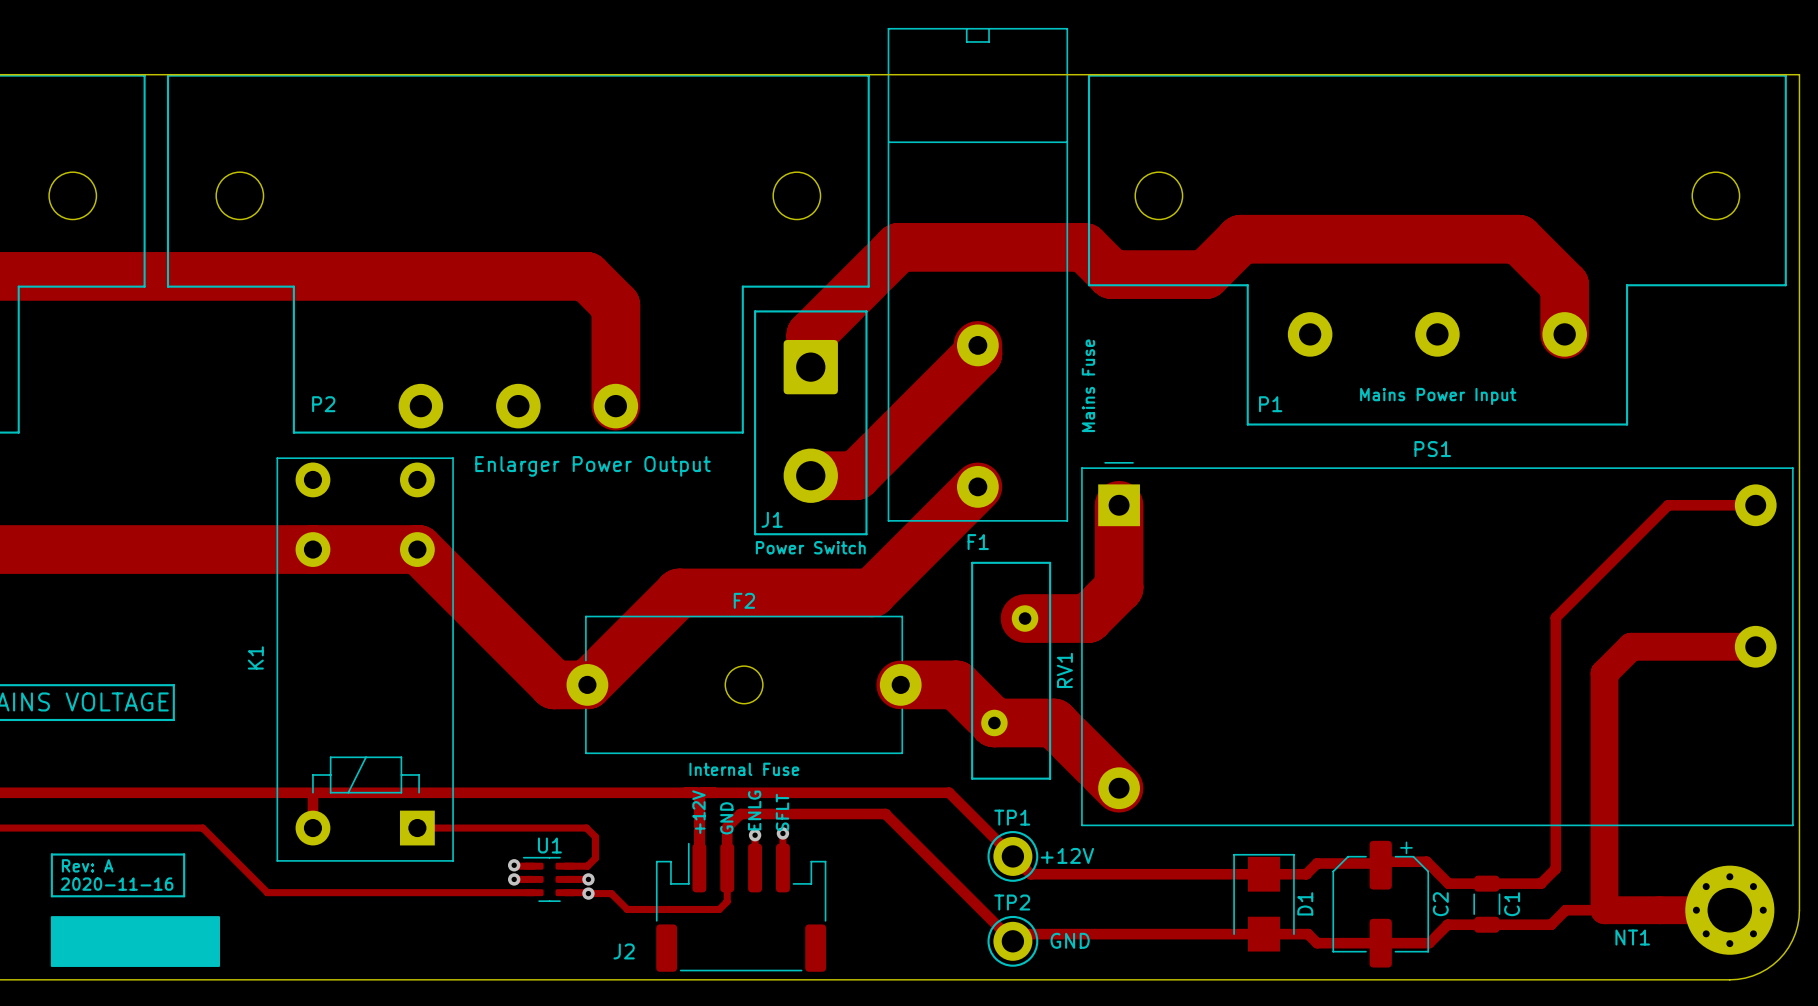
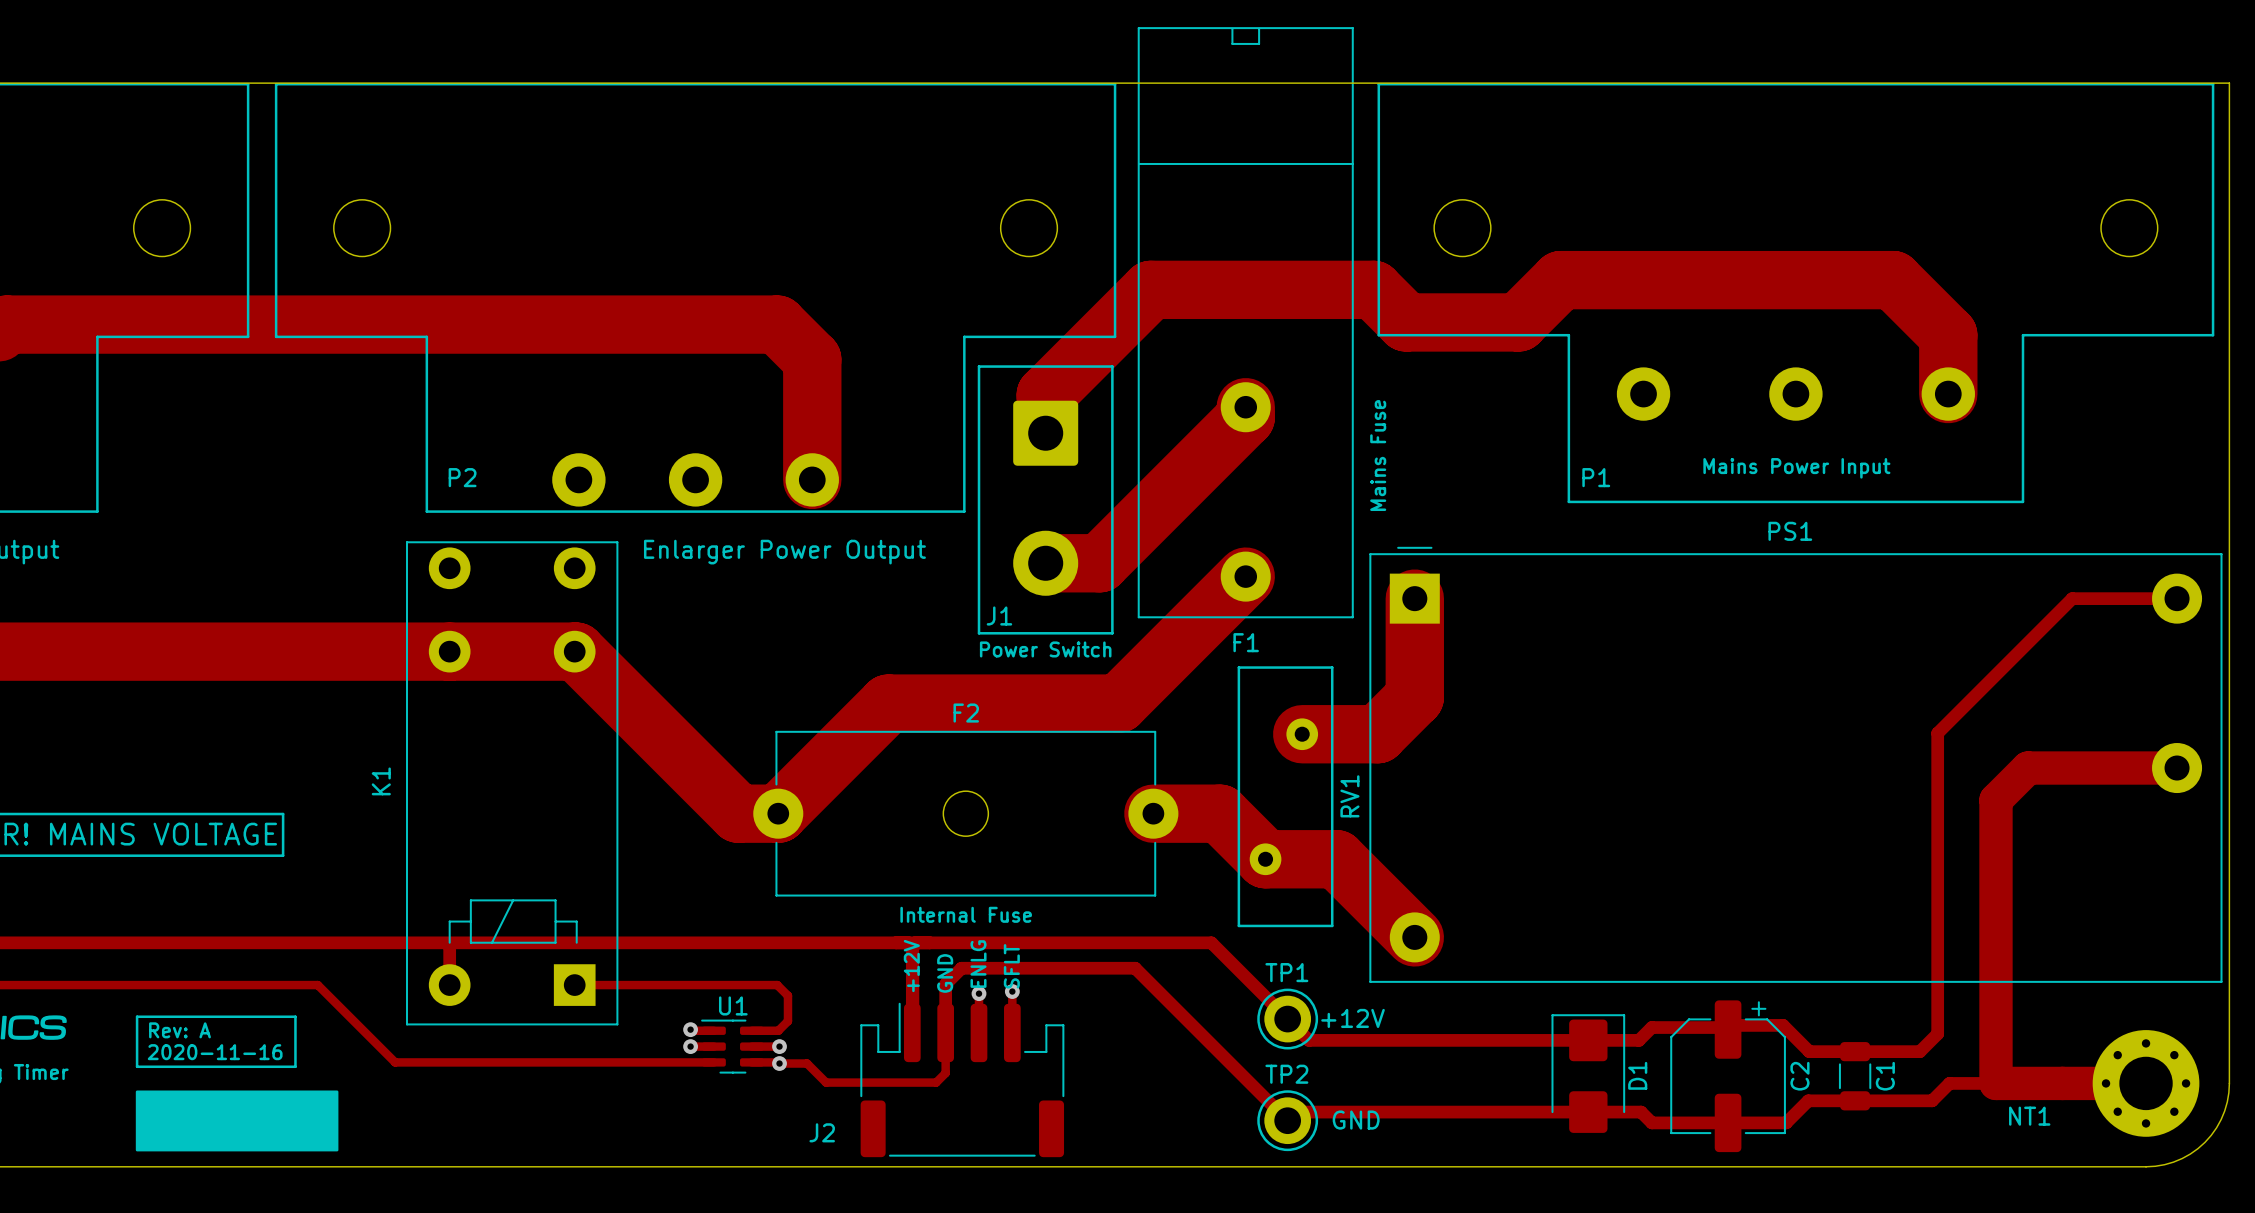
D1 footprint: [1233, 853, 1295, 952] -> [1551, 1014, 1626, 1133]

